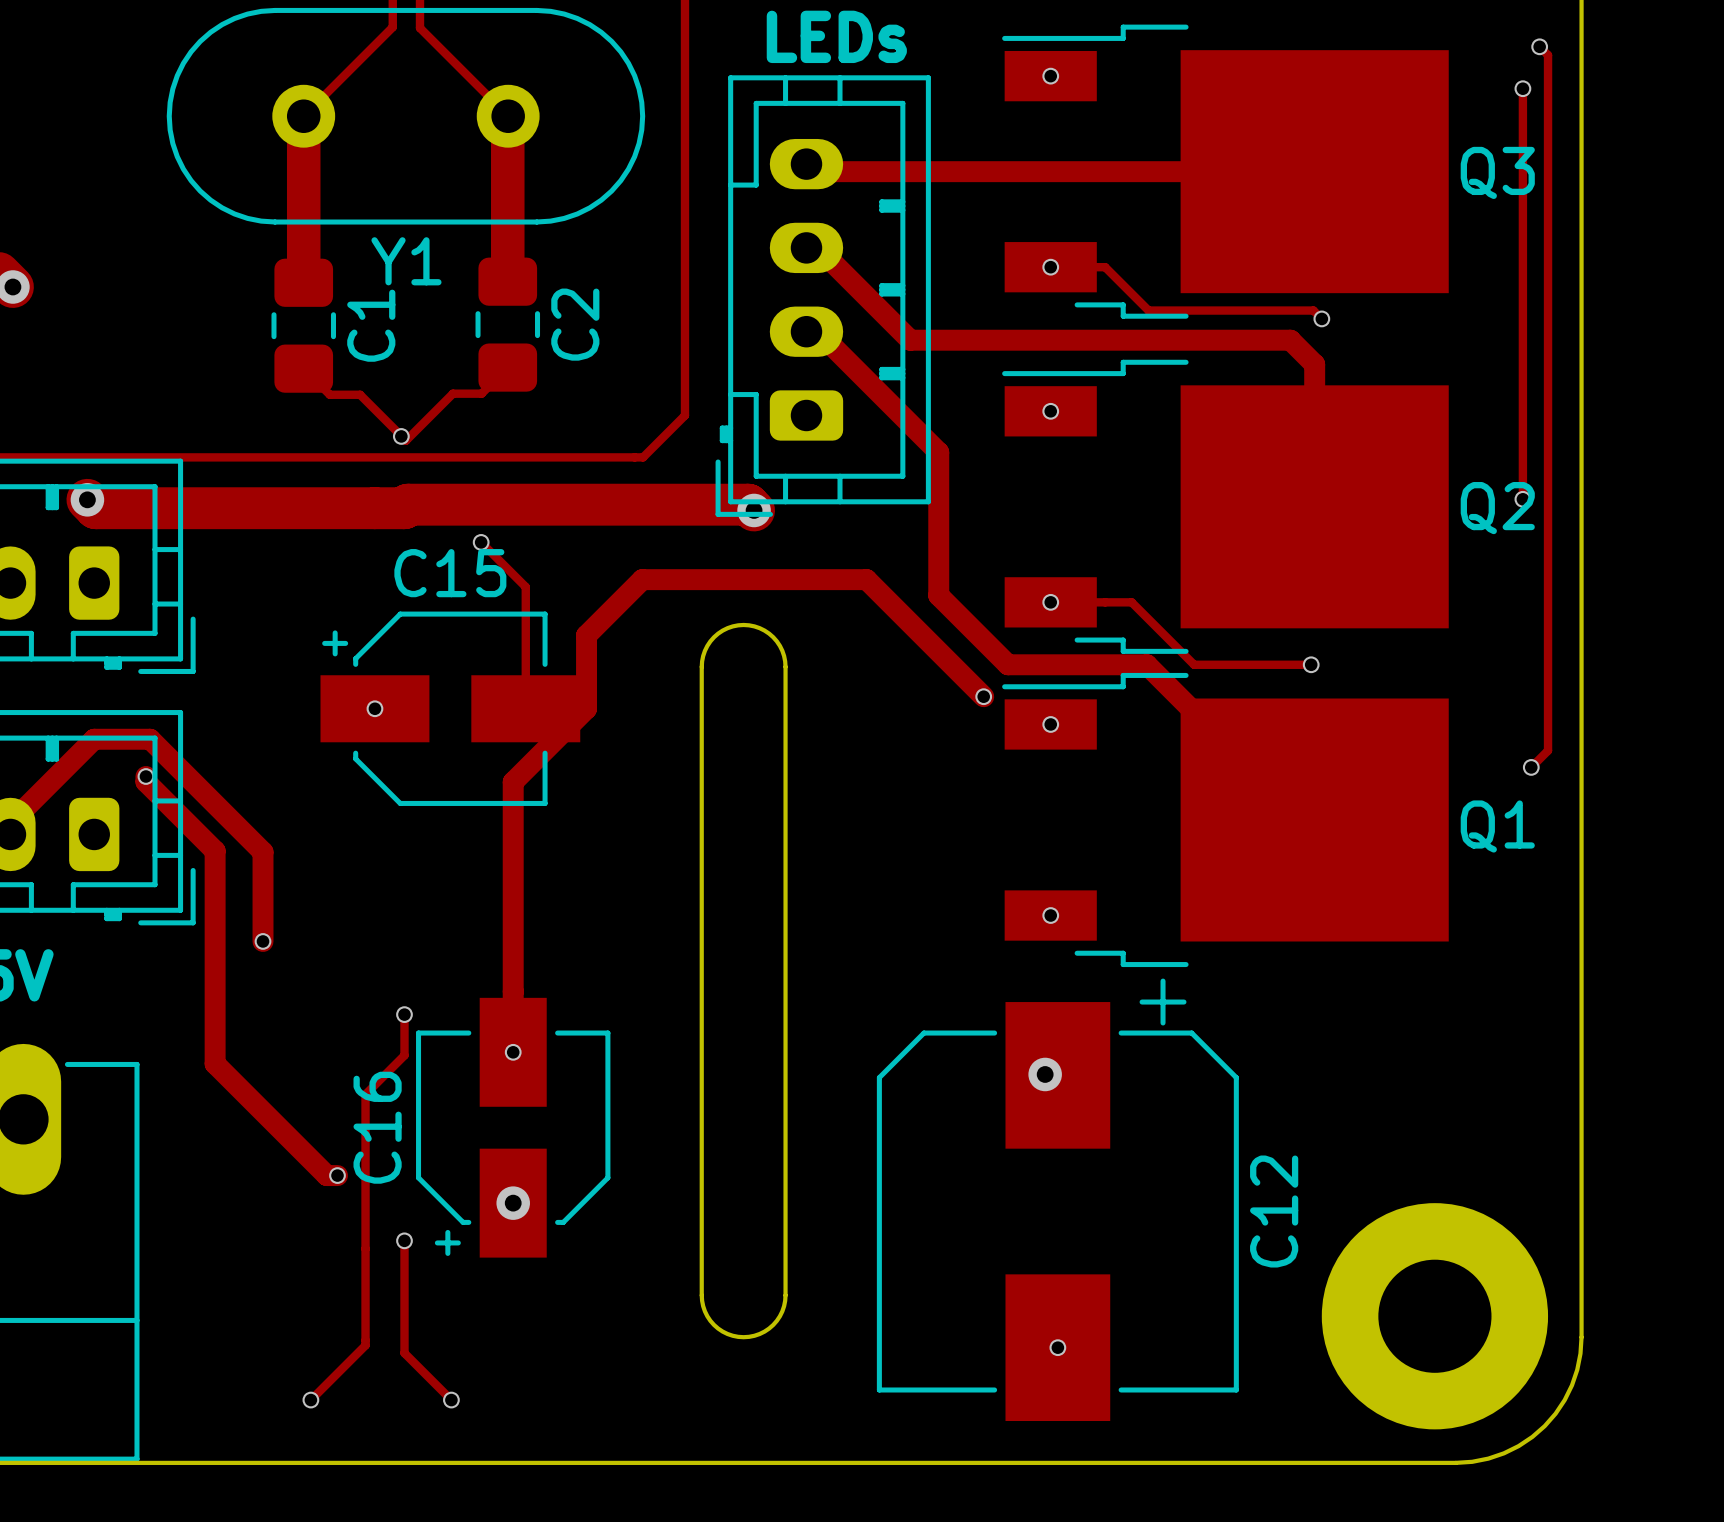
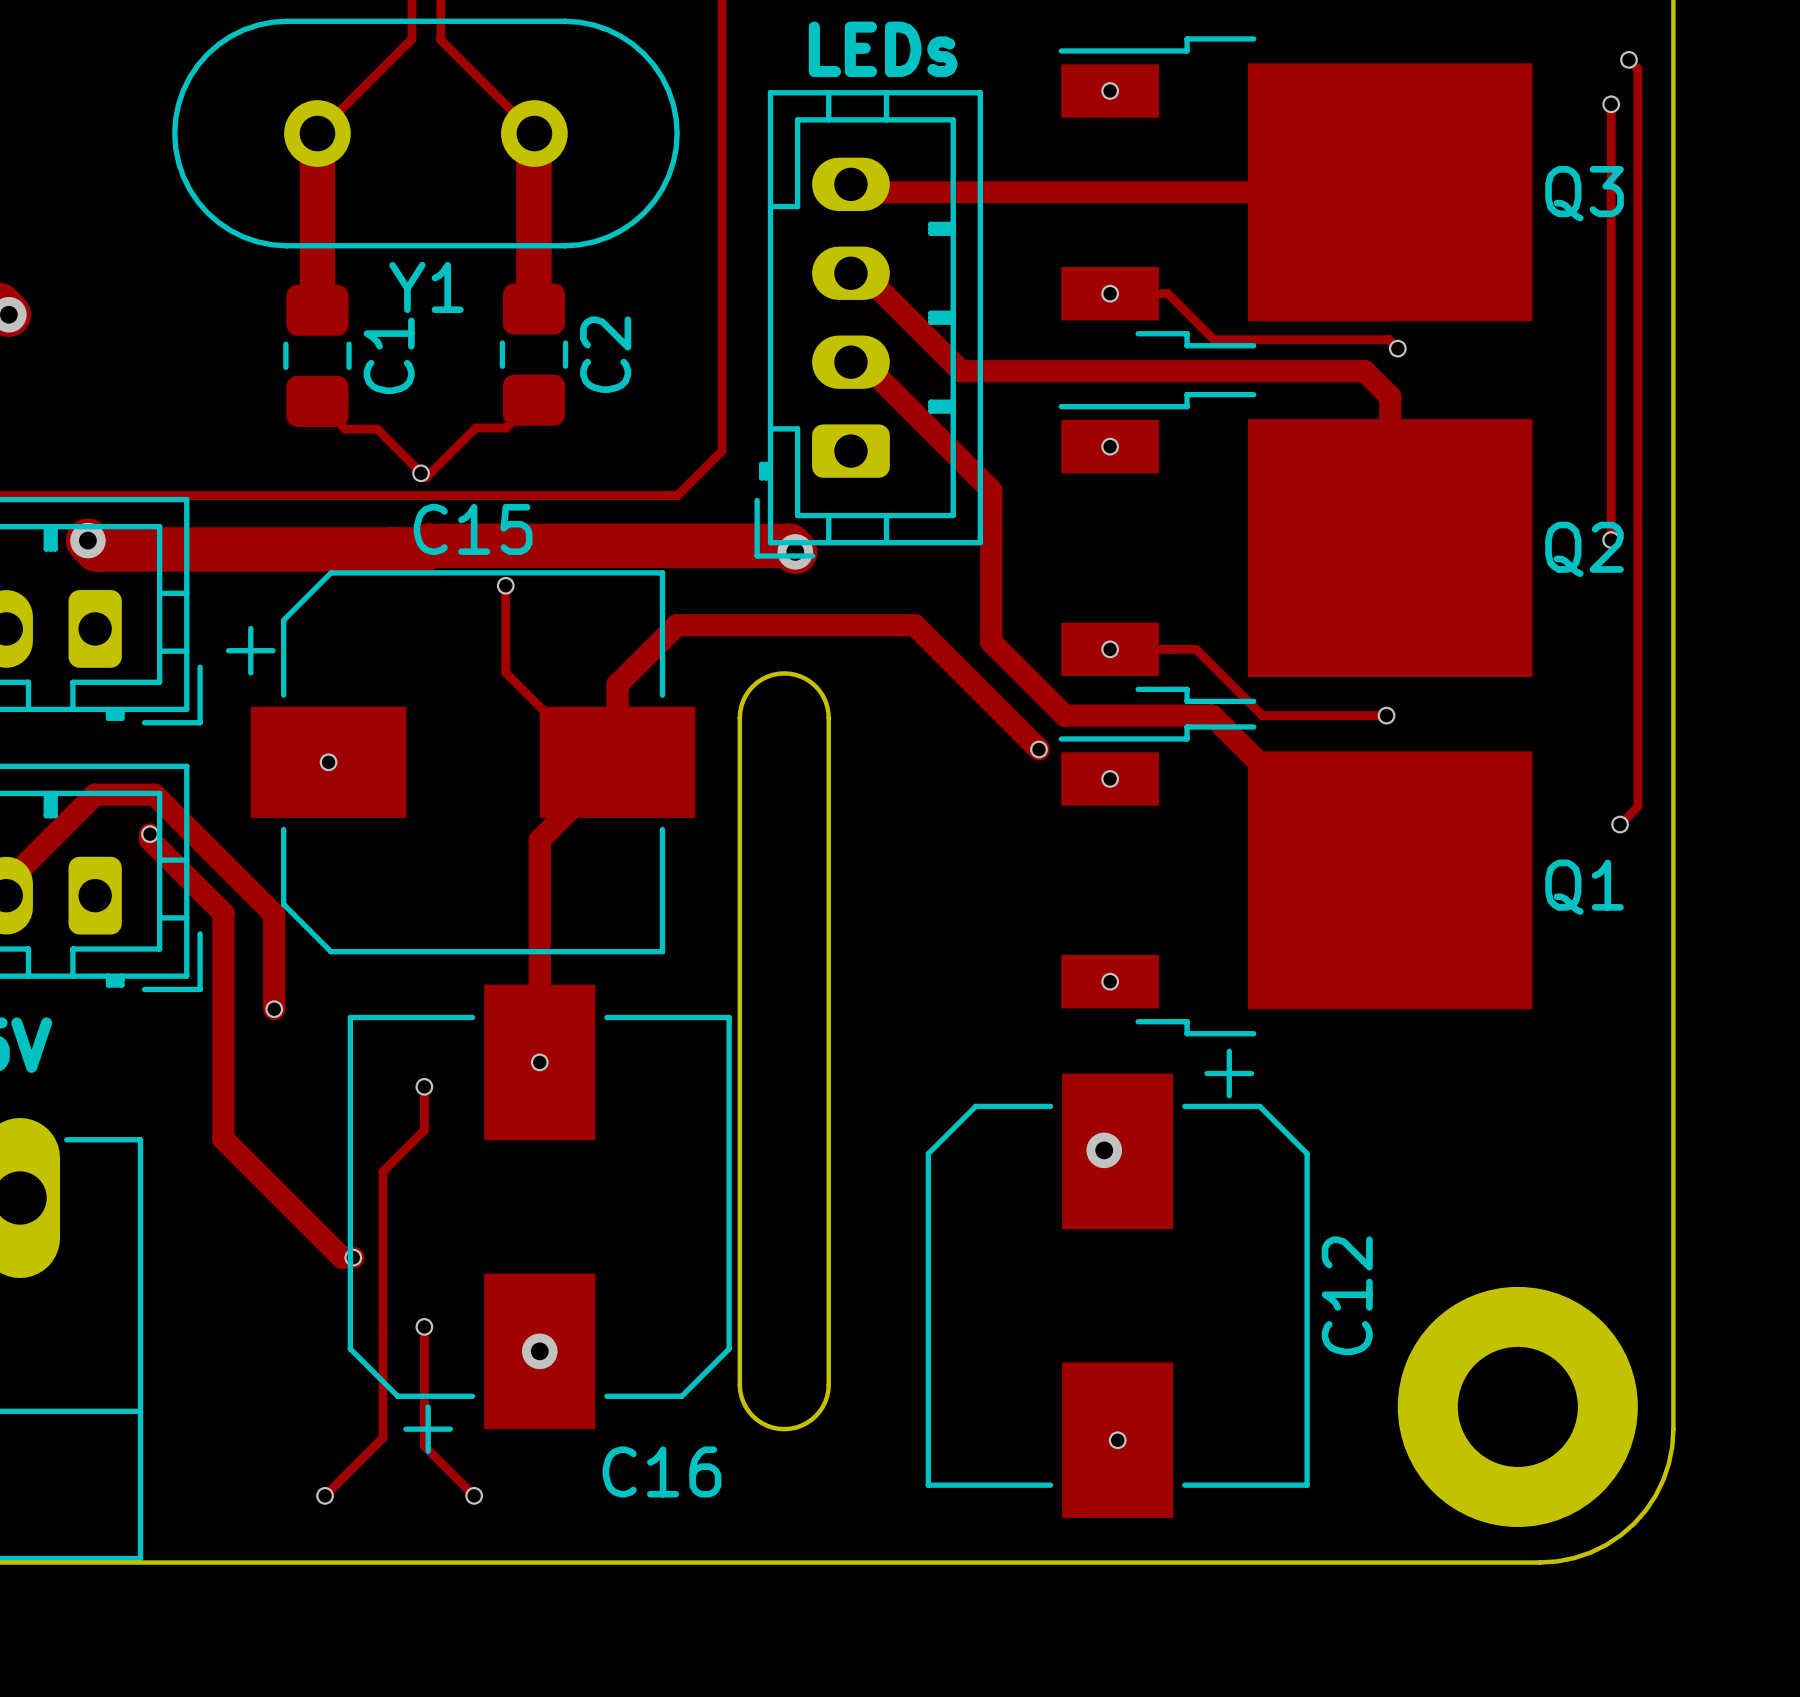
track: (481, 542) (525, 587) (525, 708) -> (505, 585) (505, 672) (595, 762)
C15 name position: C15 (450, 573) -> C15 (473, 529)
C15 footprint: [320, 611, 581, 806] -> [225, 570, 696, 955]
via position: (374, 708) -> (328, 762)
C16 footprint: [416, 997, 611, 1258] -> [347, 984, 732, 1455]
via position: (513, 1052) -> (539, 1062)
C16 name position: C16 (377, 1127) -> C16 (662, 1471)
via position: (513, 1203) -> (539, 1351)

